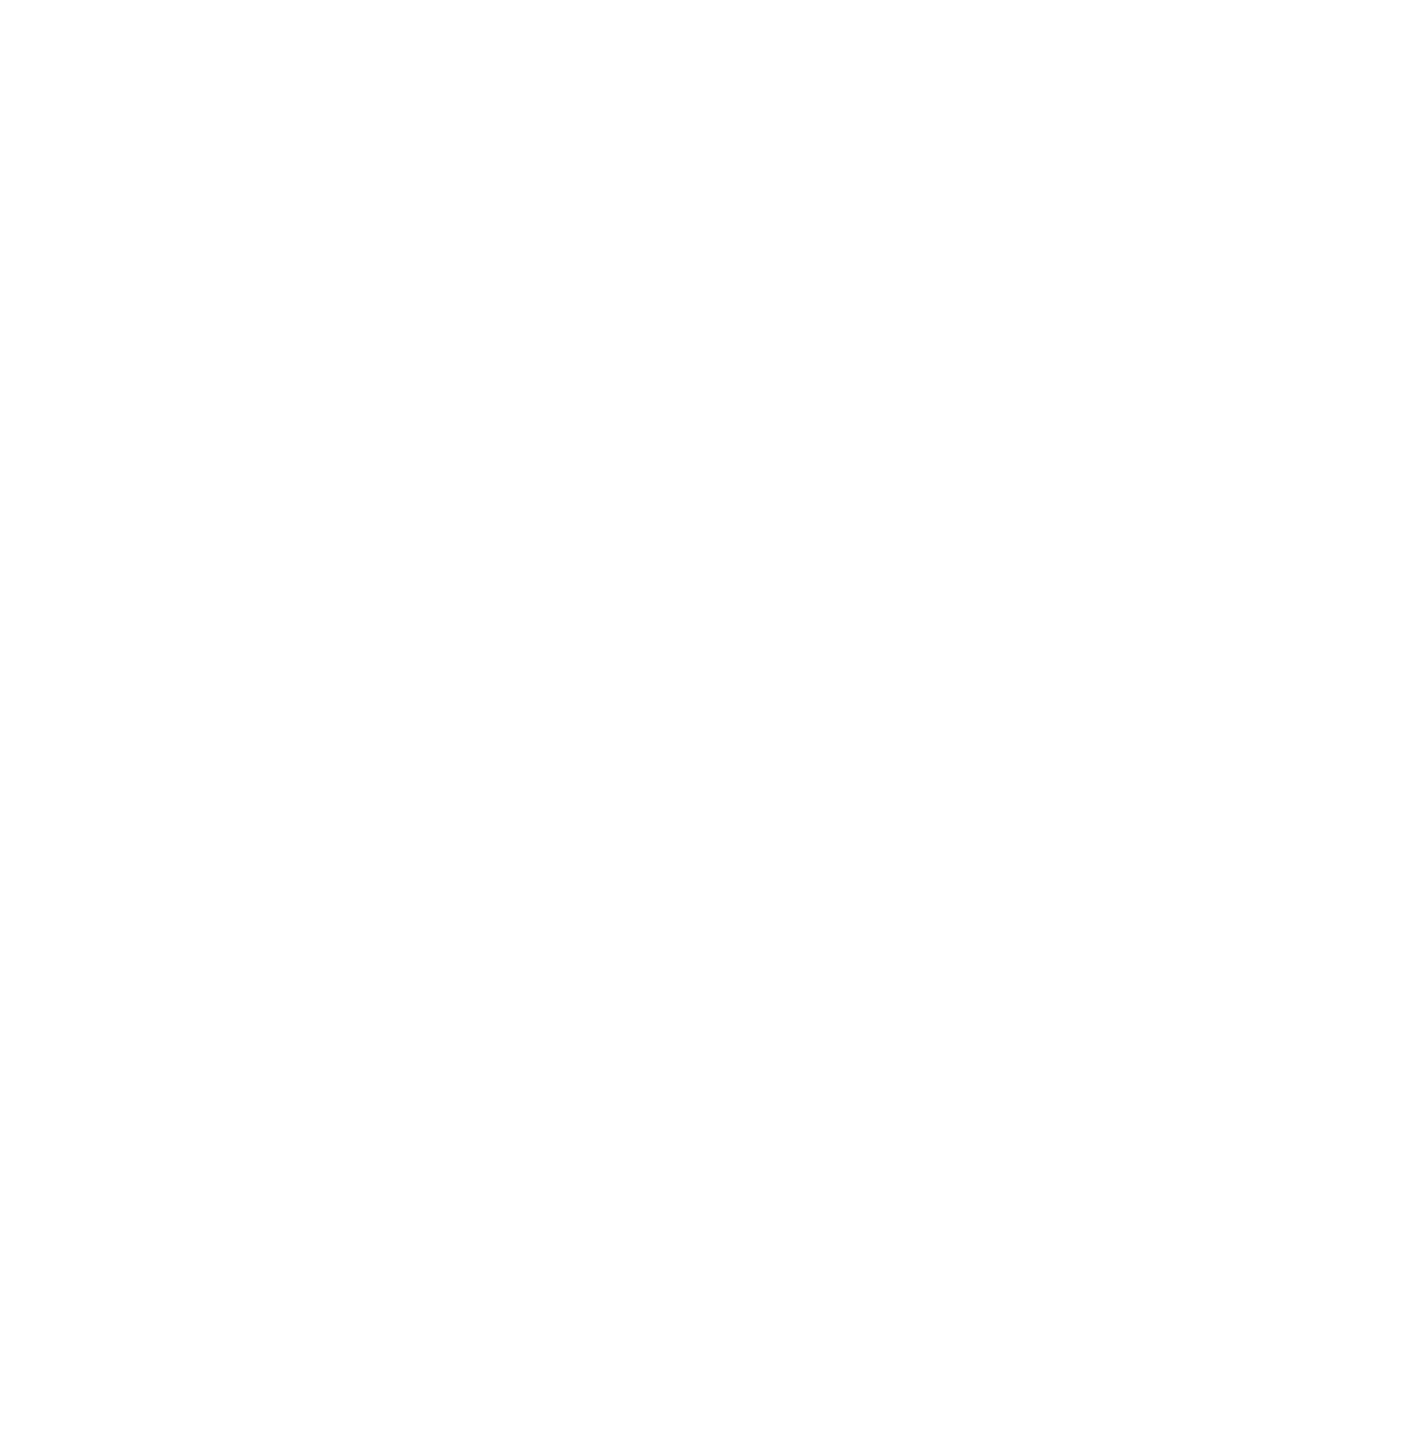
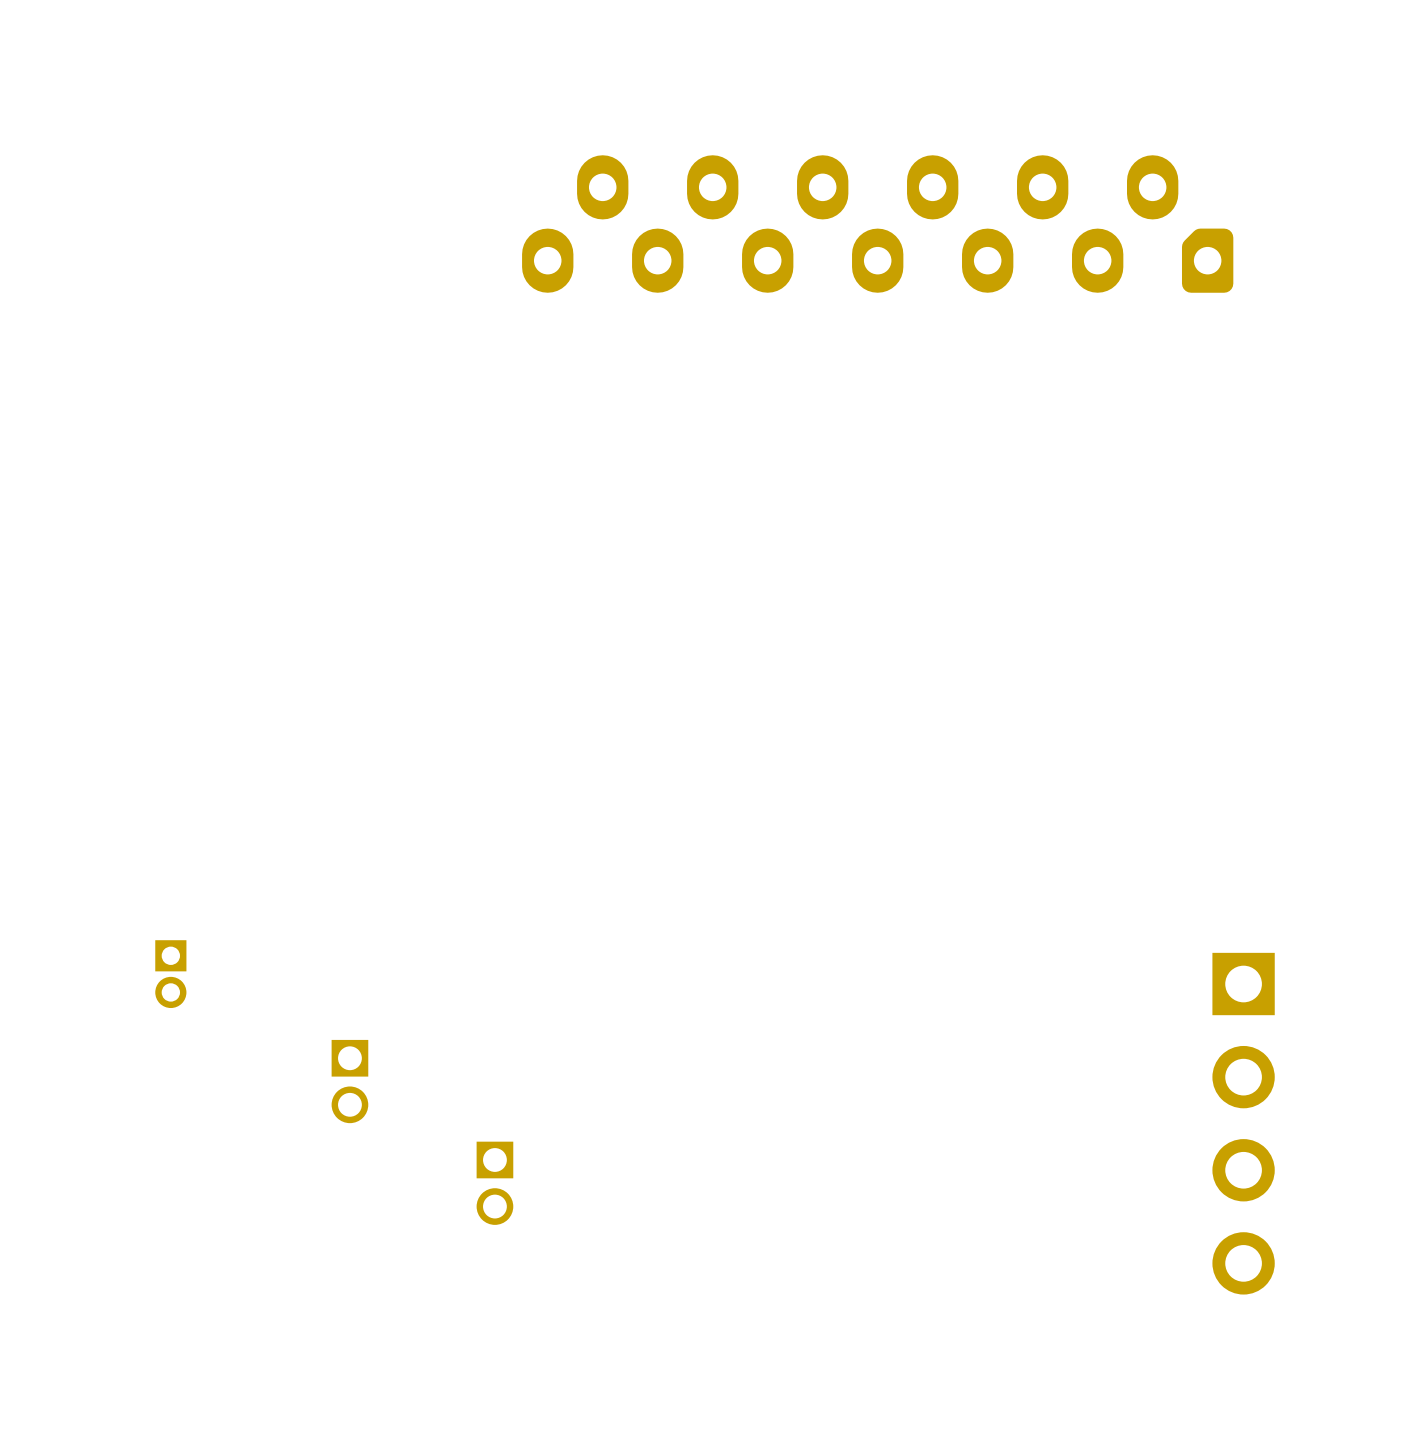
part: none -> (877, 224)
part: none -> (170, 974)
part: none -> (349, 1081)
part: none -> (1243, 1123)
part: none -> (494, 1183)

